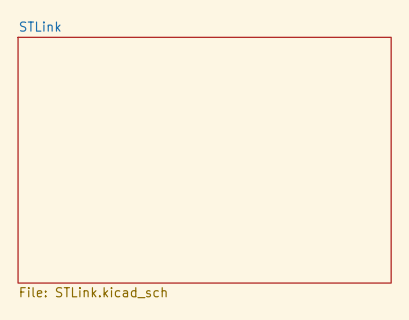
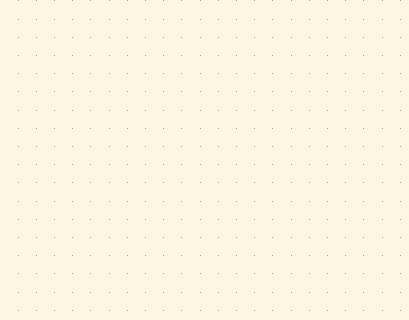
sheet STLink: File: STLink.kicad_sch (204, 160) -> none

